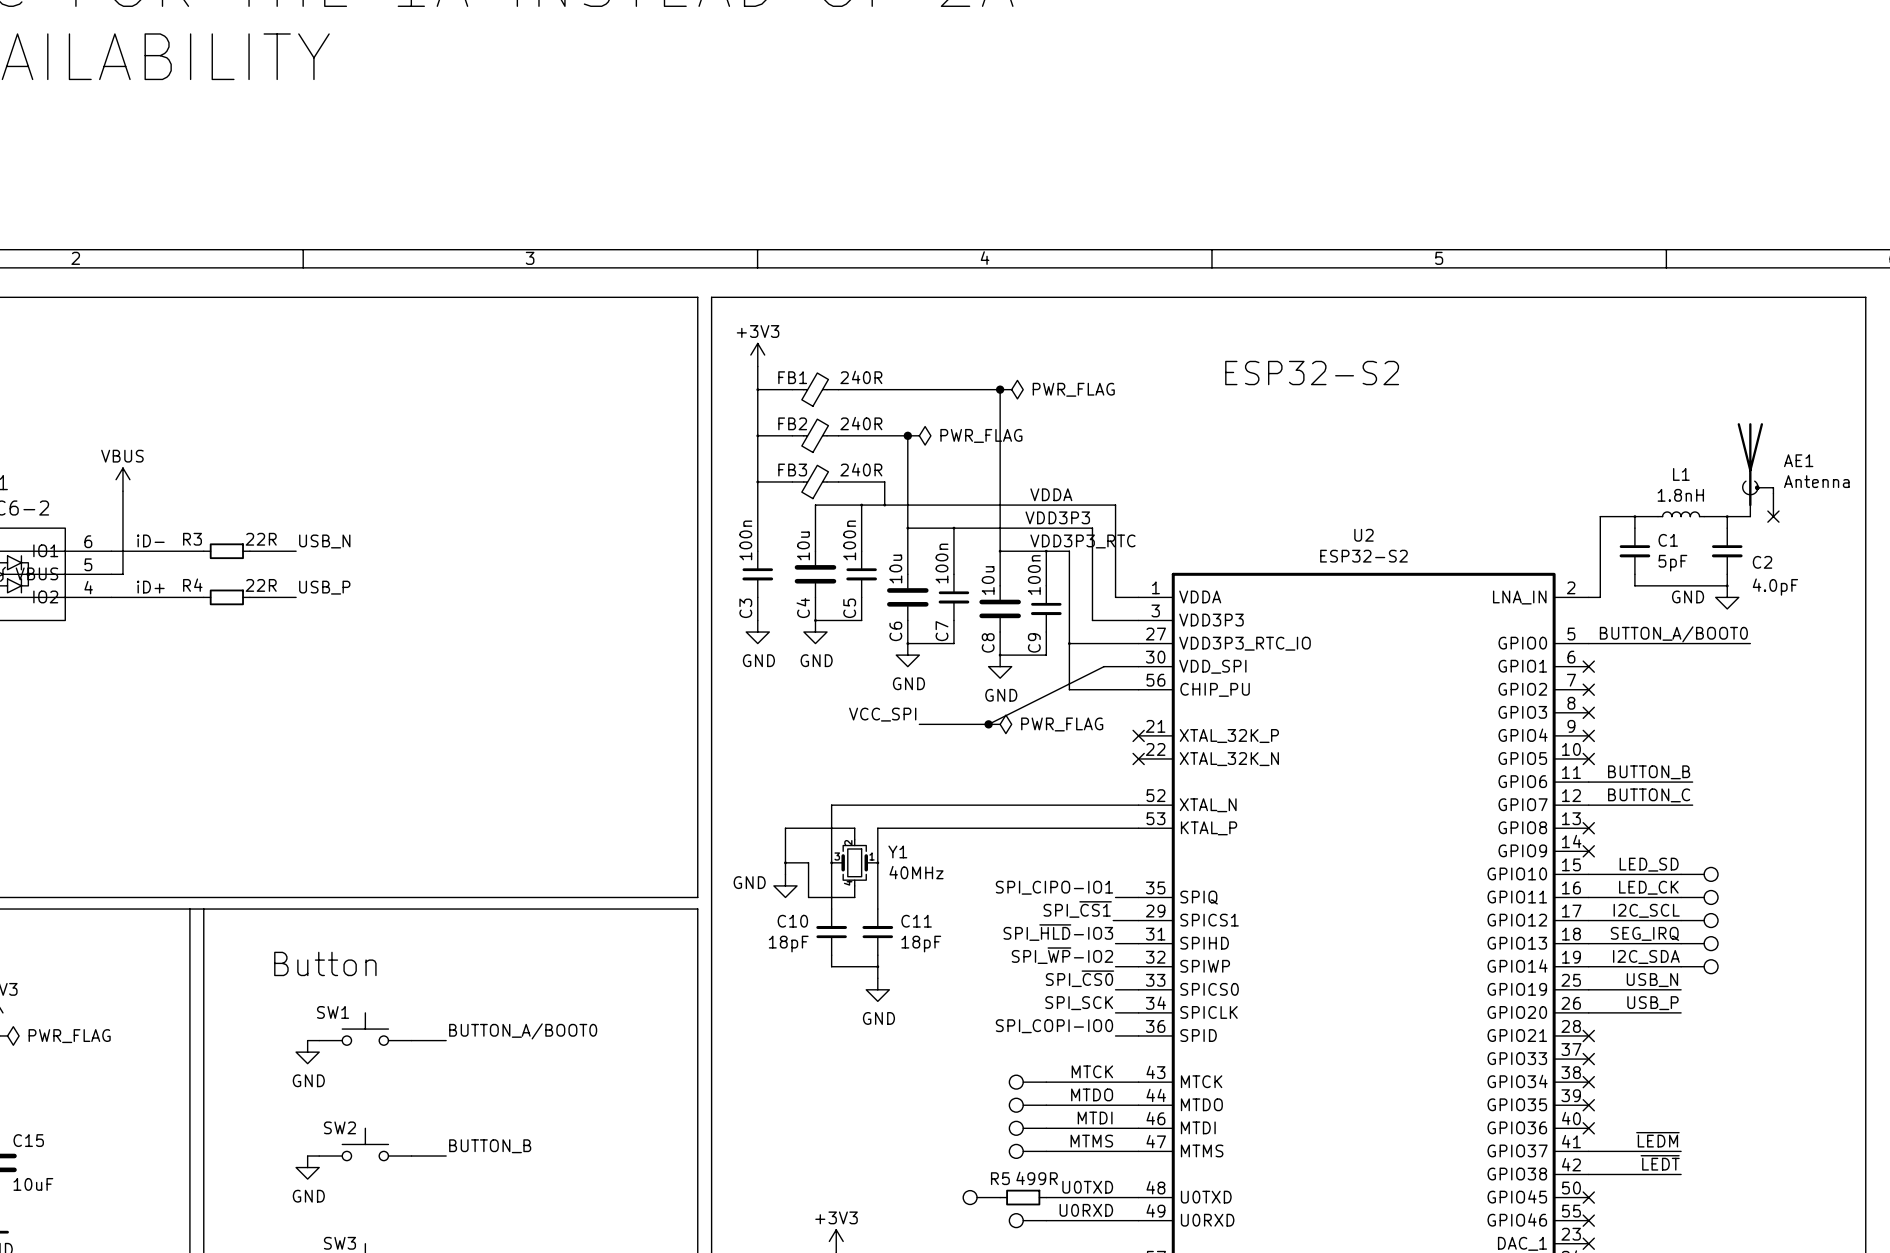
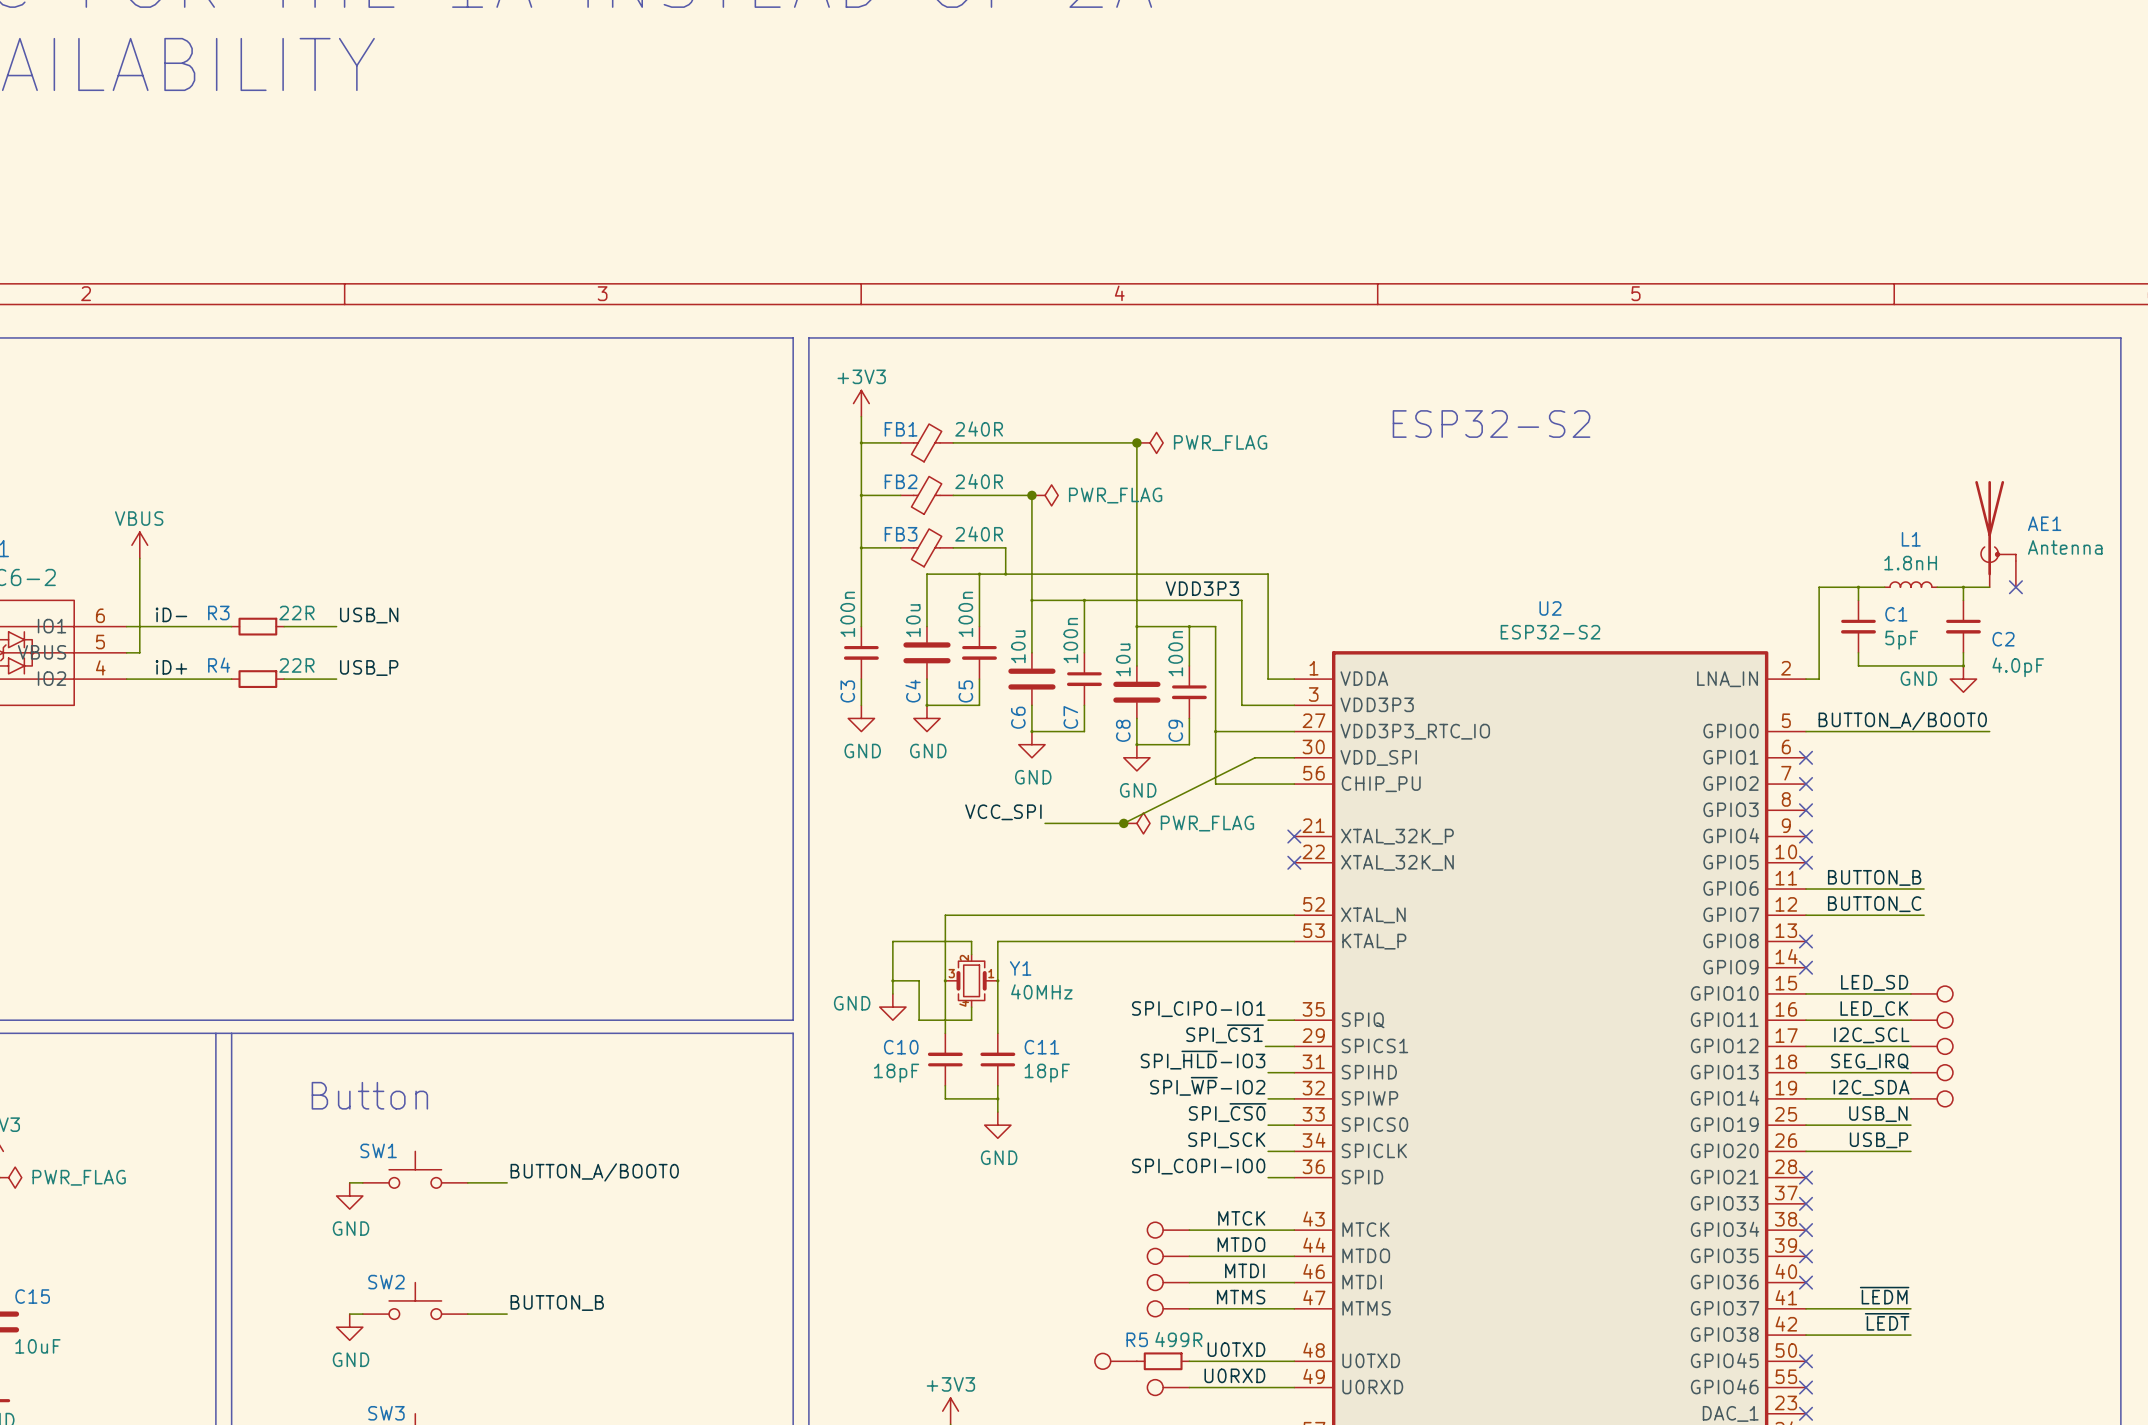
label: VDDA (1051, 494) -> none
label: VDD3P3_RTC (1082, 541) -> none

